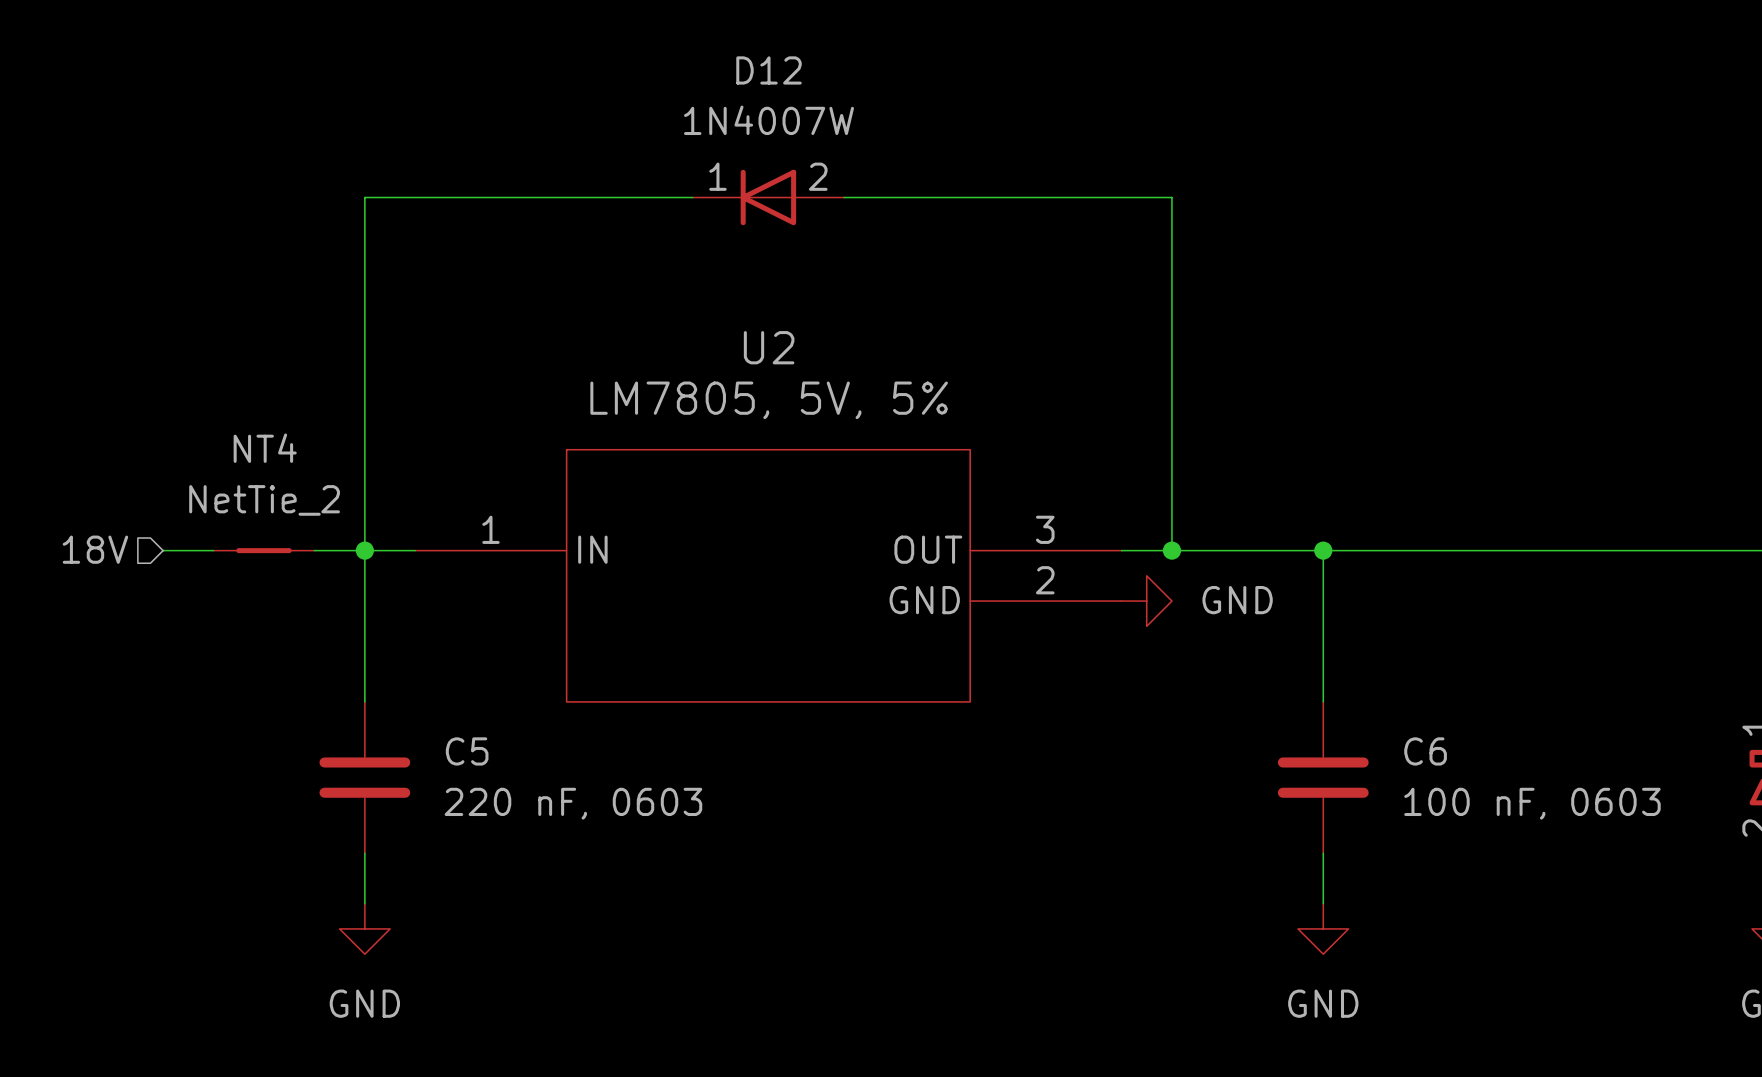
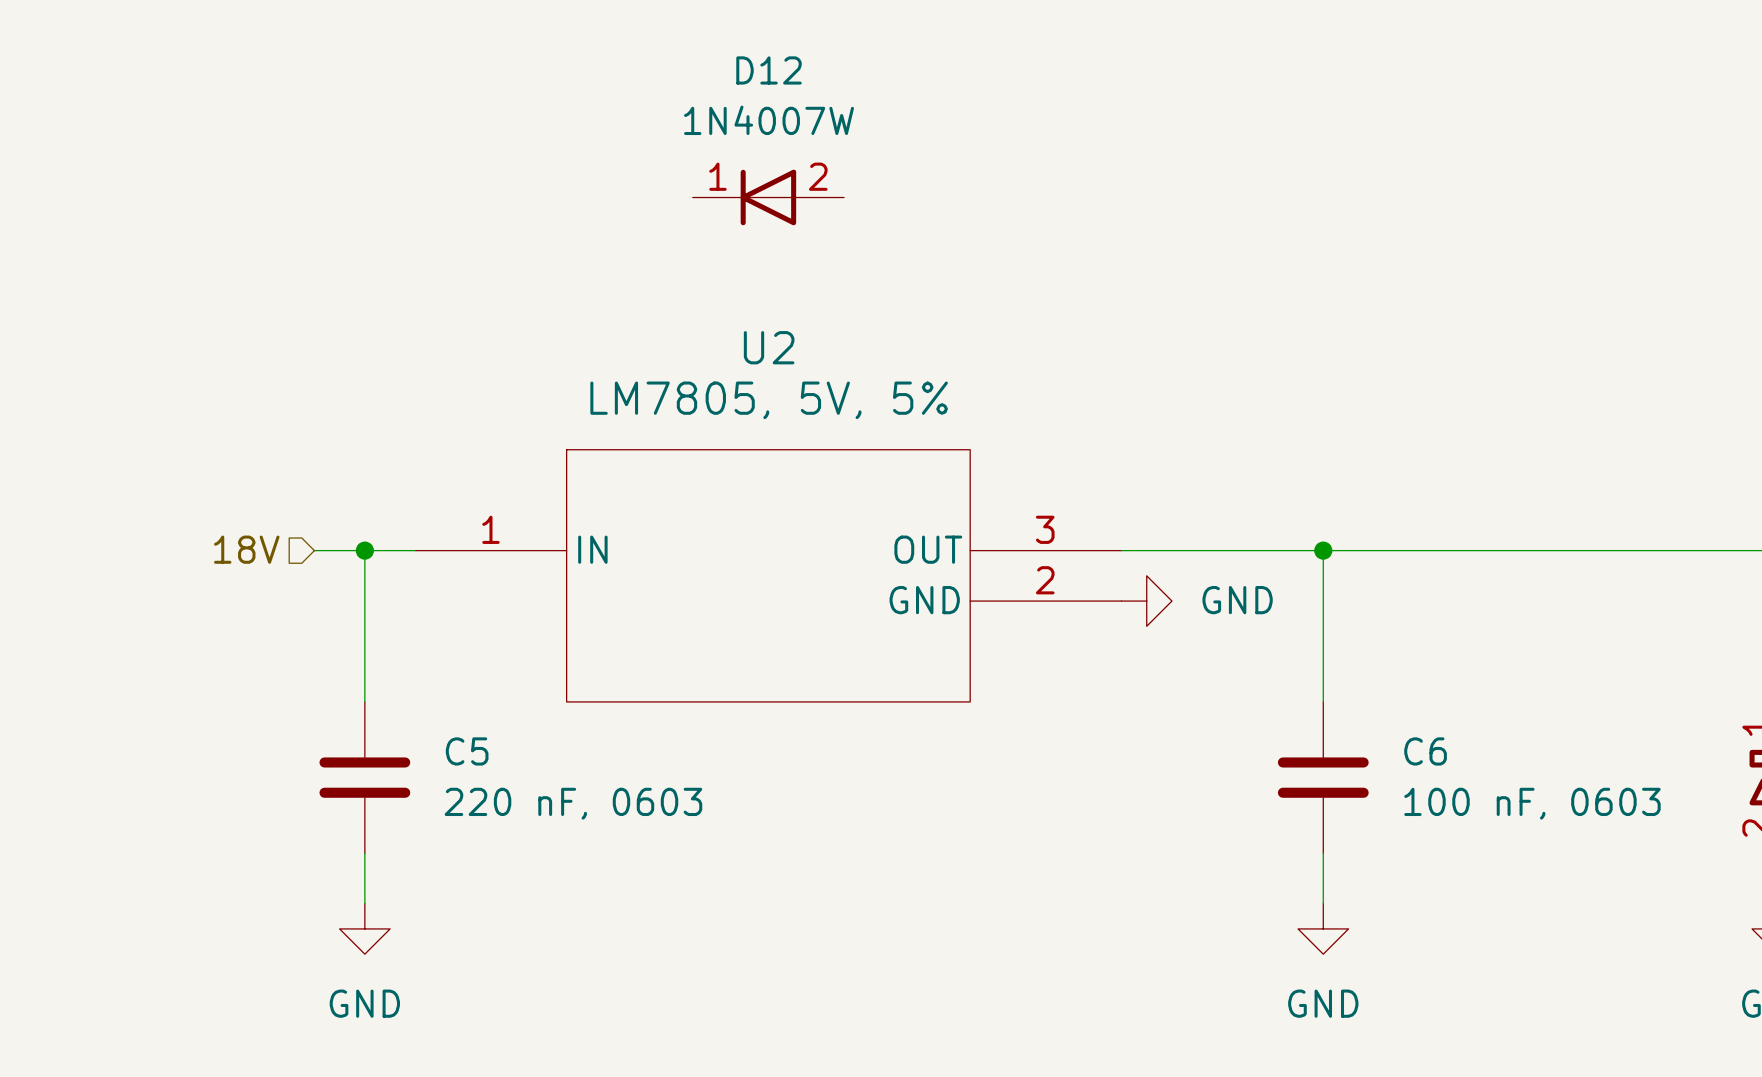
wire: (692, 197) (364, 197) (364, 550) -> none
wire: (844, 197) (1171, 197) (1171, 550) -> none
hierarchical label position: 18V (95, 549) -> 18V (246, 549)
wire: (163, 550) (213, 550) -> none
NT4: NetTie_2 (263, 550) -> none
junction: (1171, 550) -> none

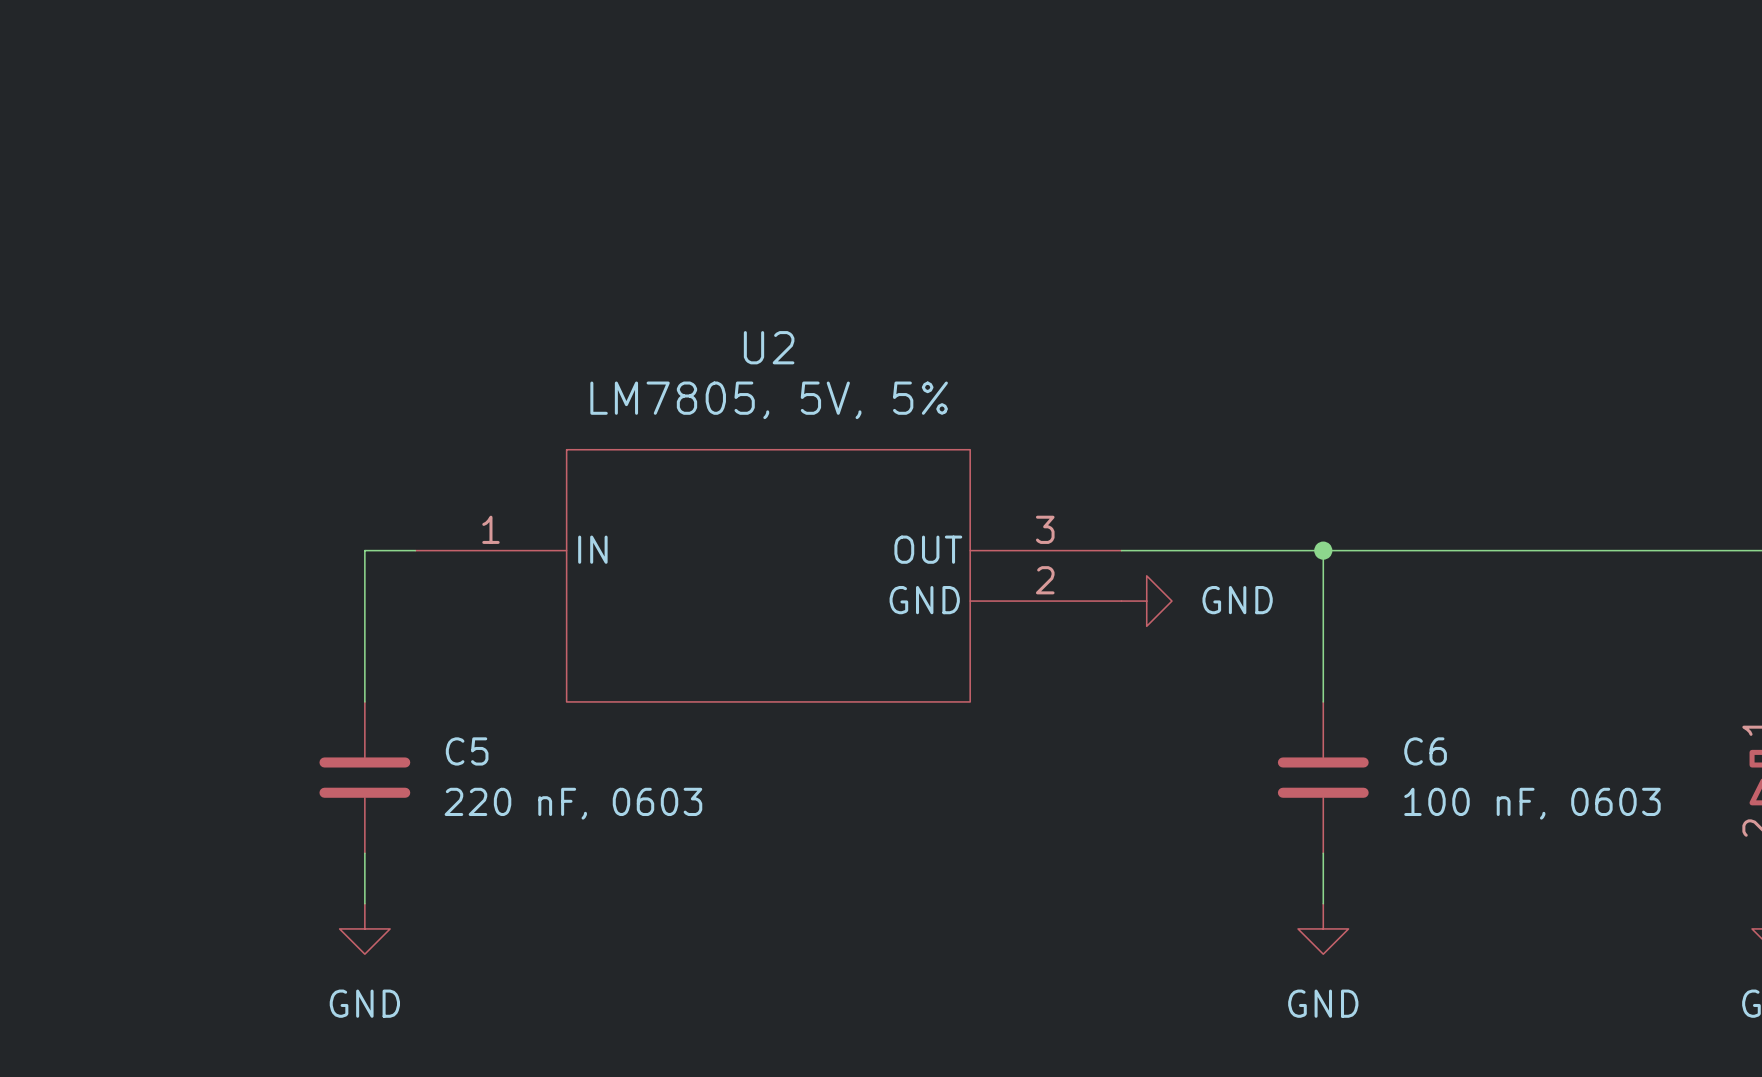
D12: 1N4007W (768, 197) -> none
hierarchical label: 18V (246, 549) -> none
wire: (314, 550) (364, 550) -> none
junction: (364, 550) -> none

